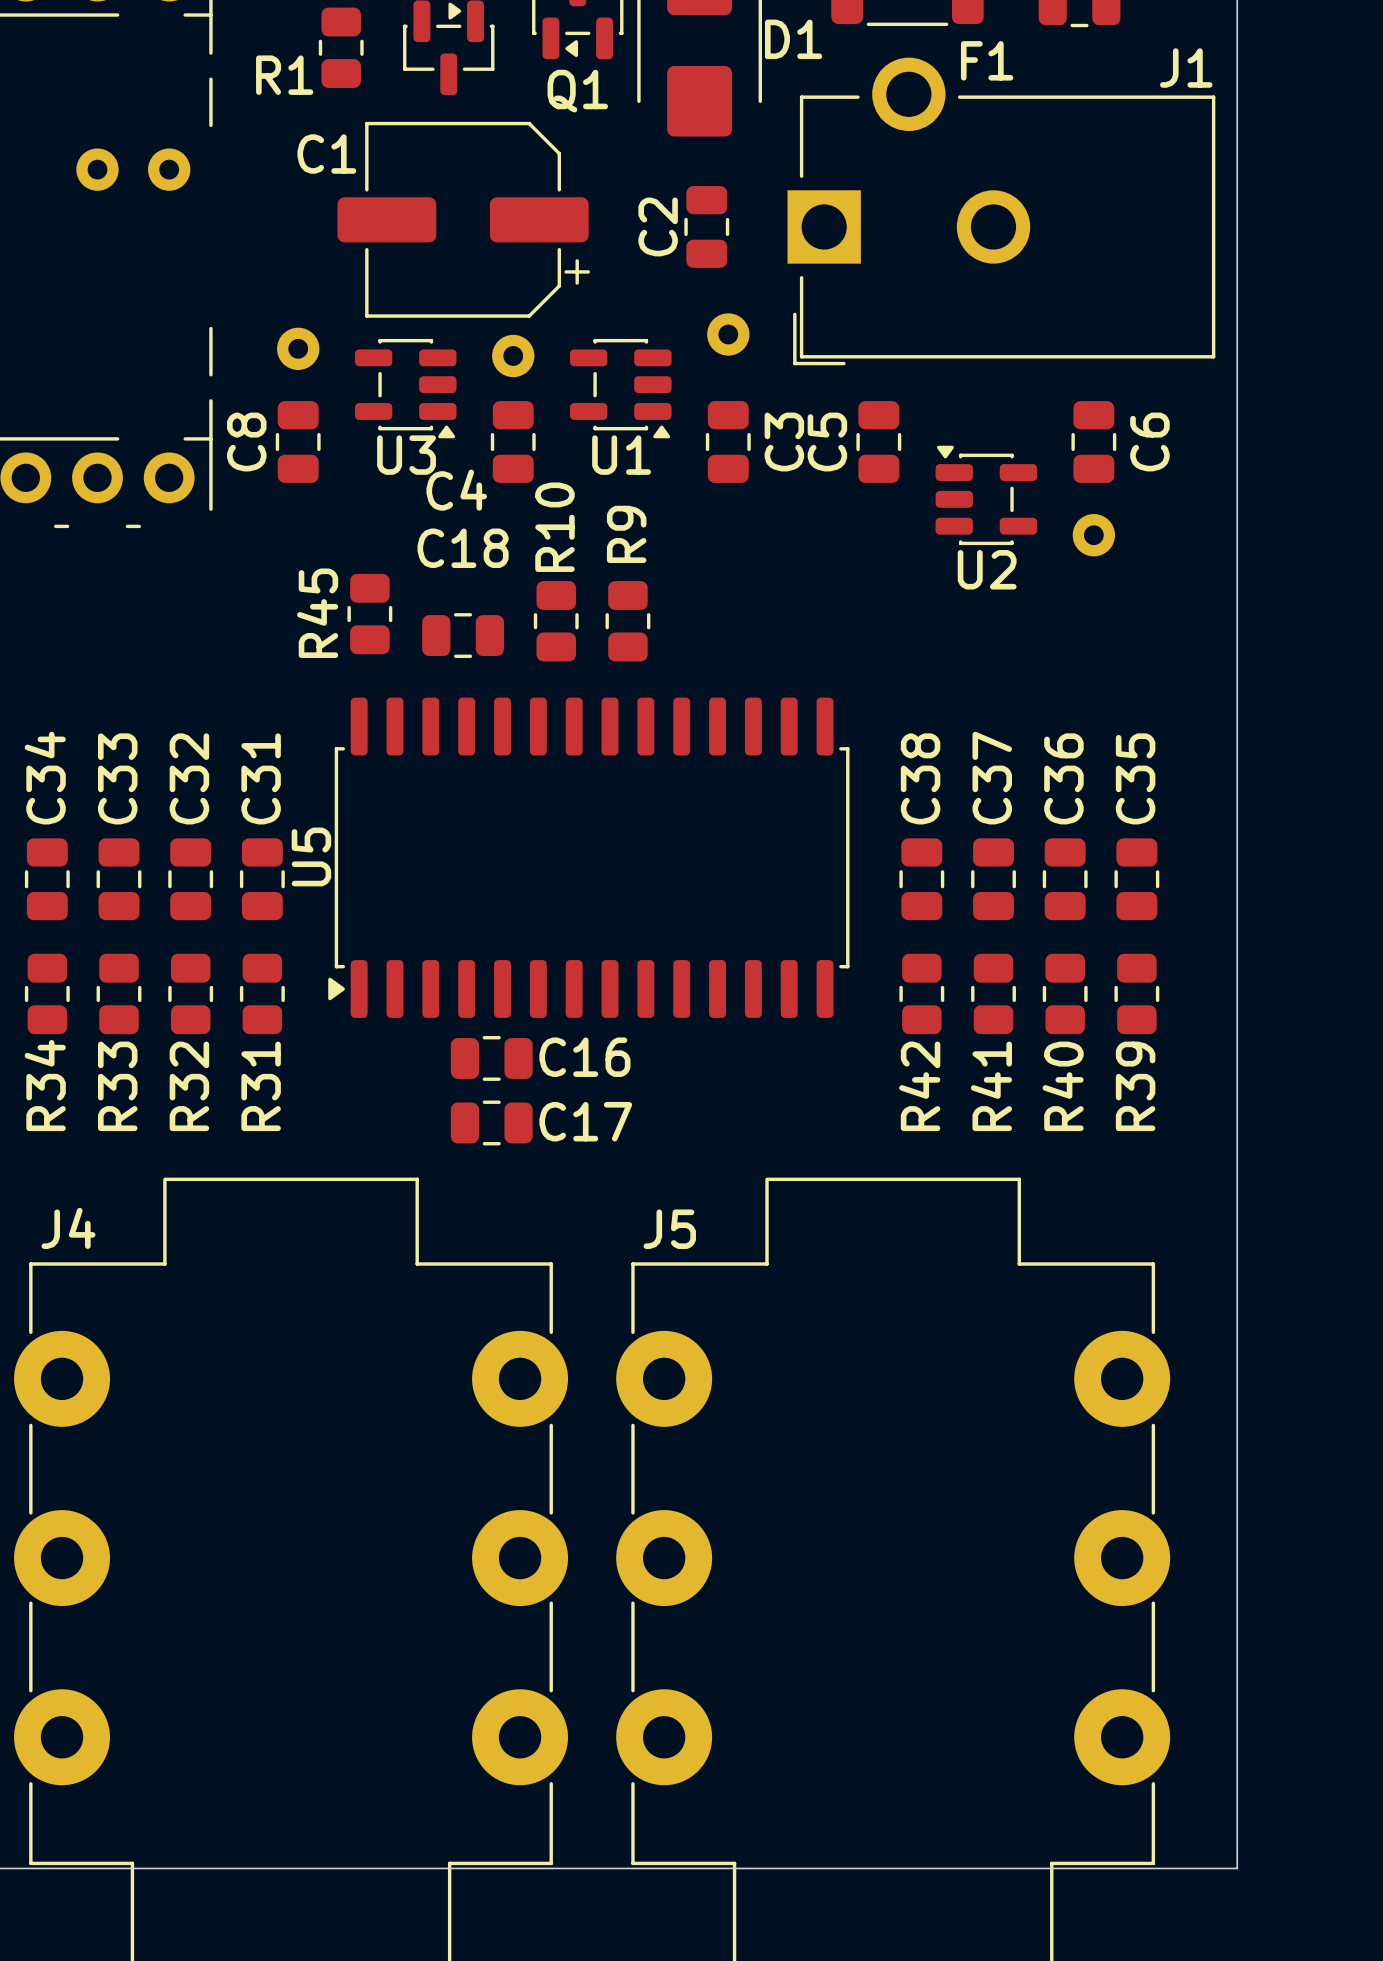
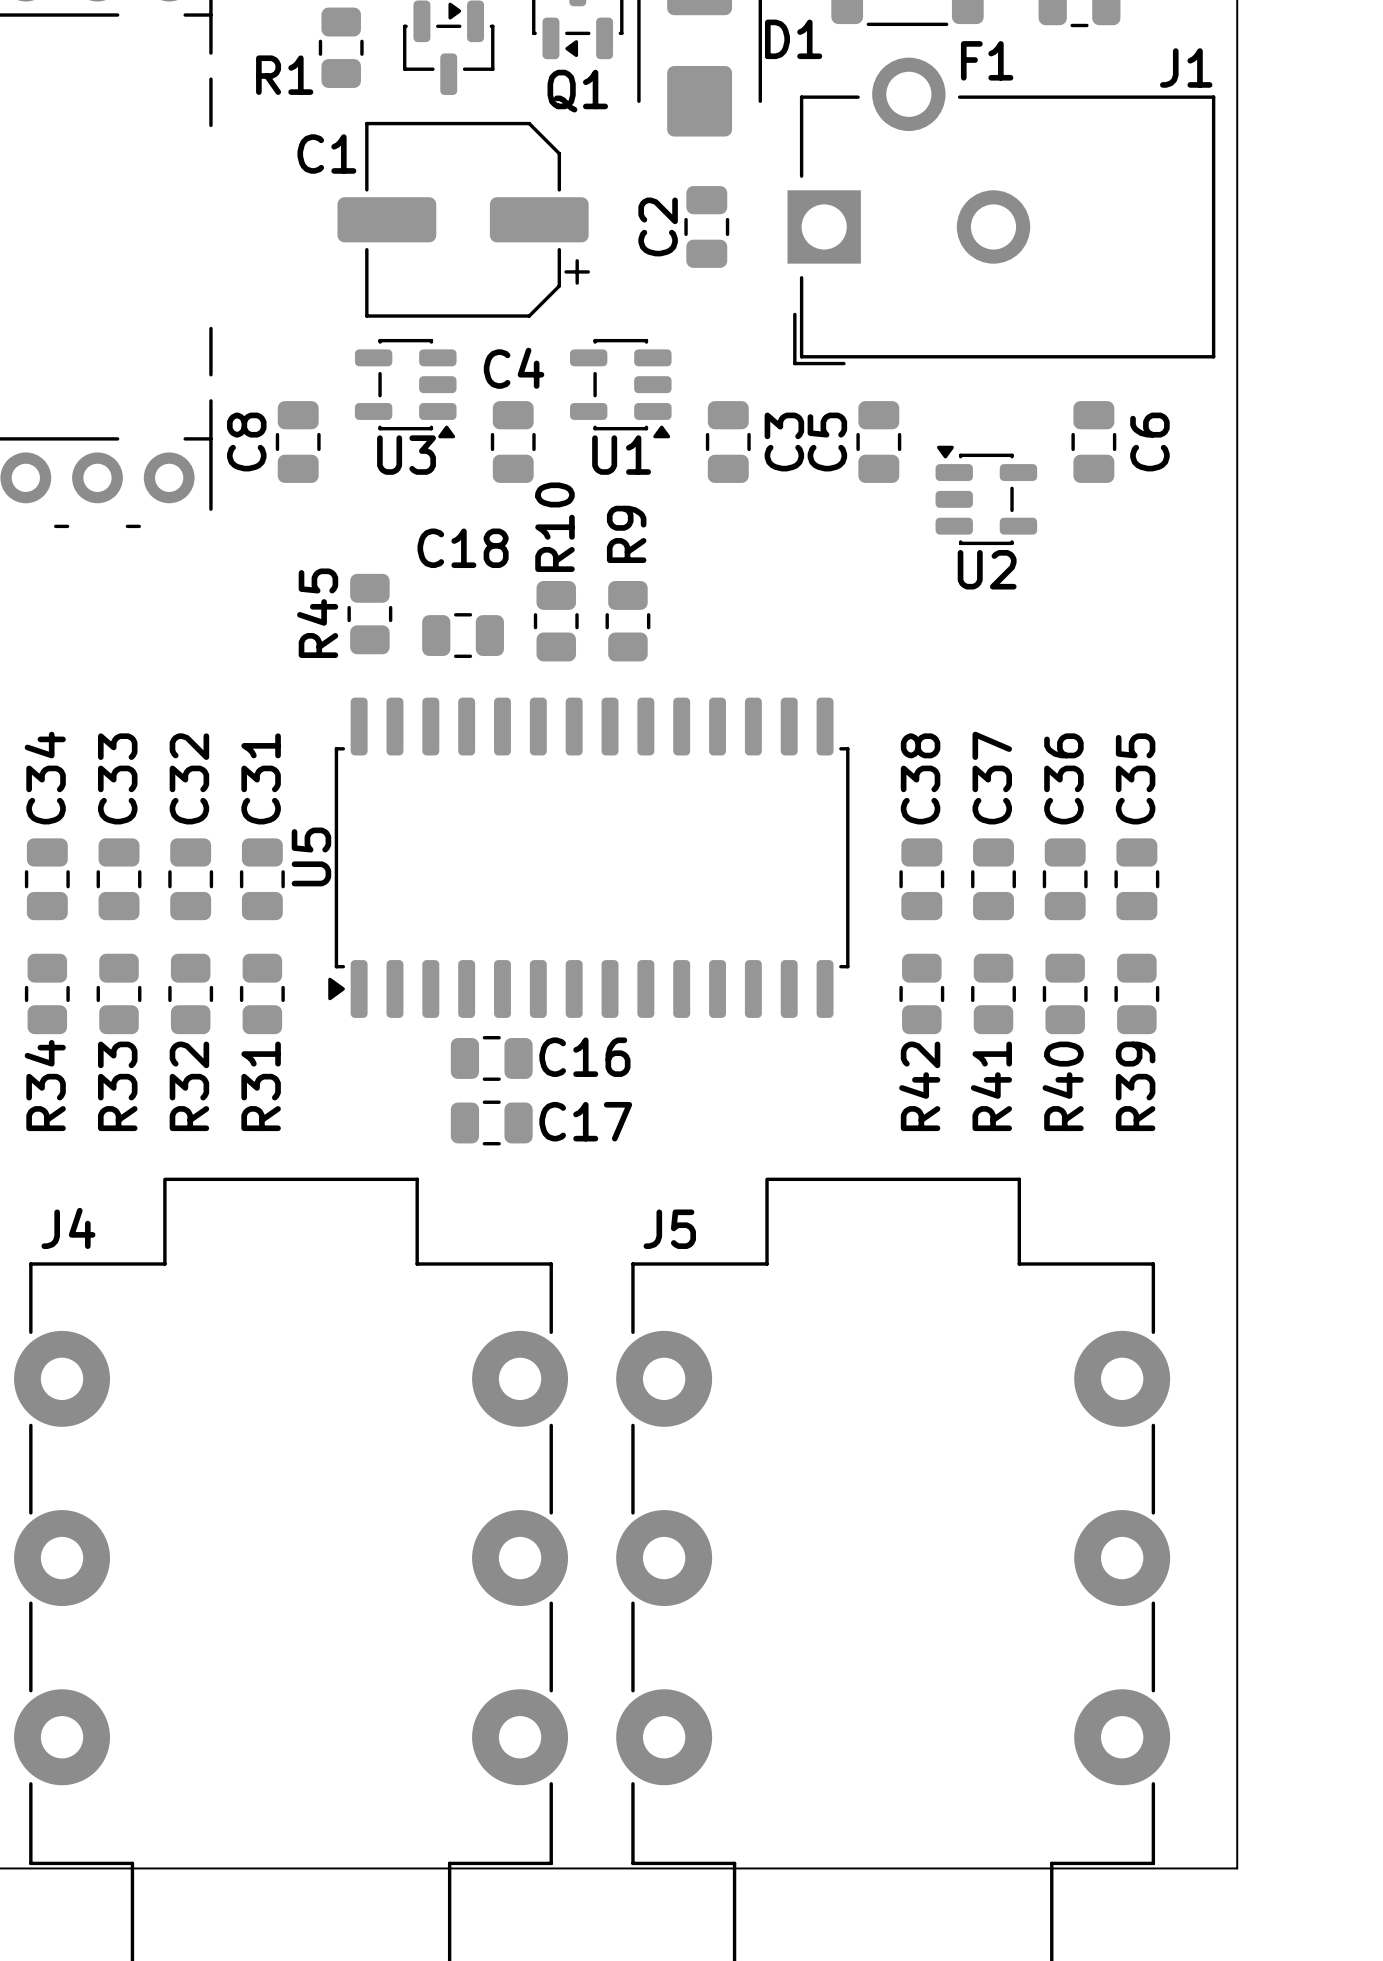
part: (97, 169) -> none
part: (169, 169) -> none
part: (728, 334) -> none
part: (298, 348) -> none
part: (513, 355) -> none
C4 name position: C4 (456, 490) -> C4 (514, 368)
part: (1093, 535) -> none

